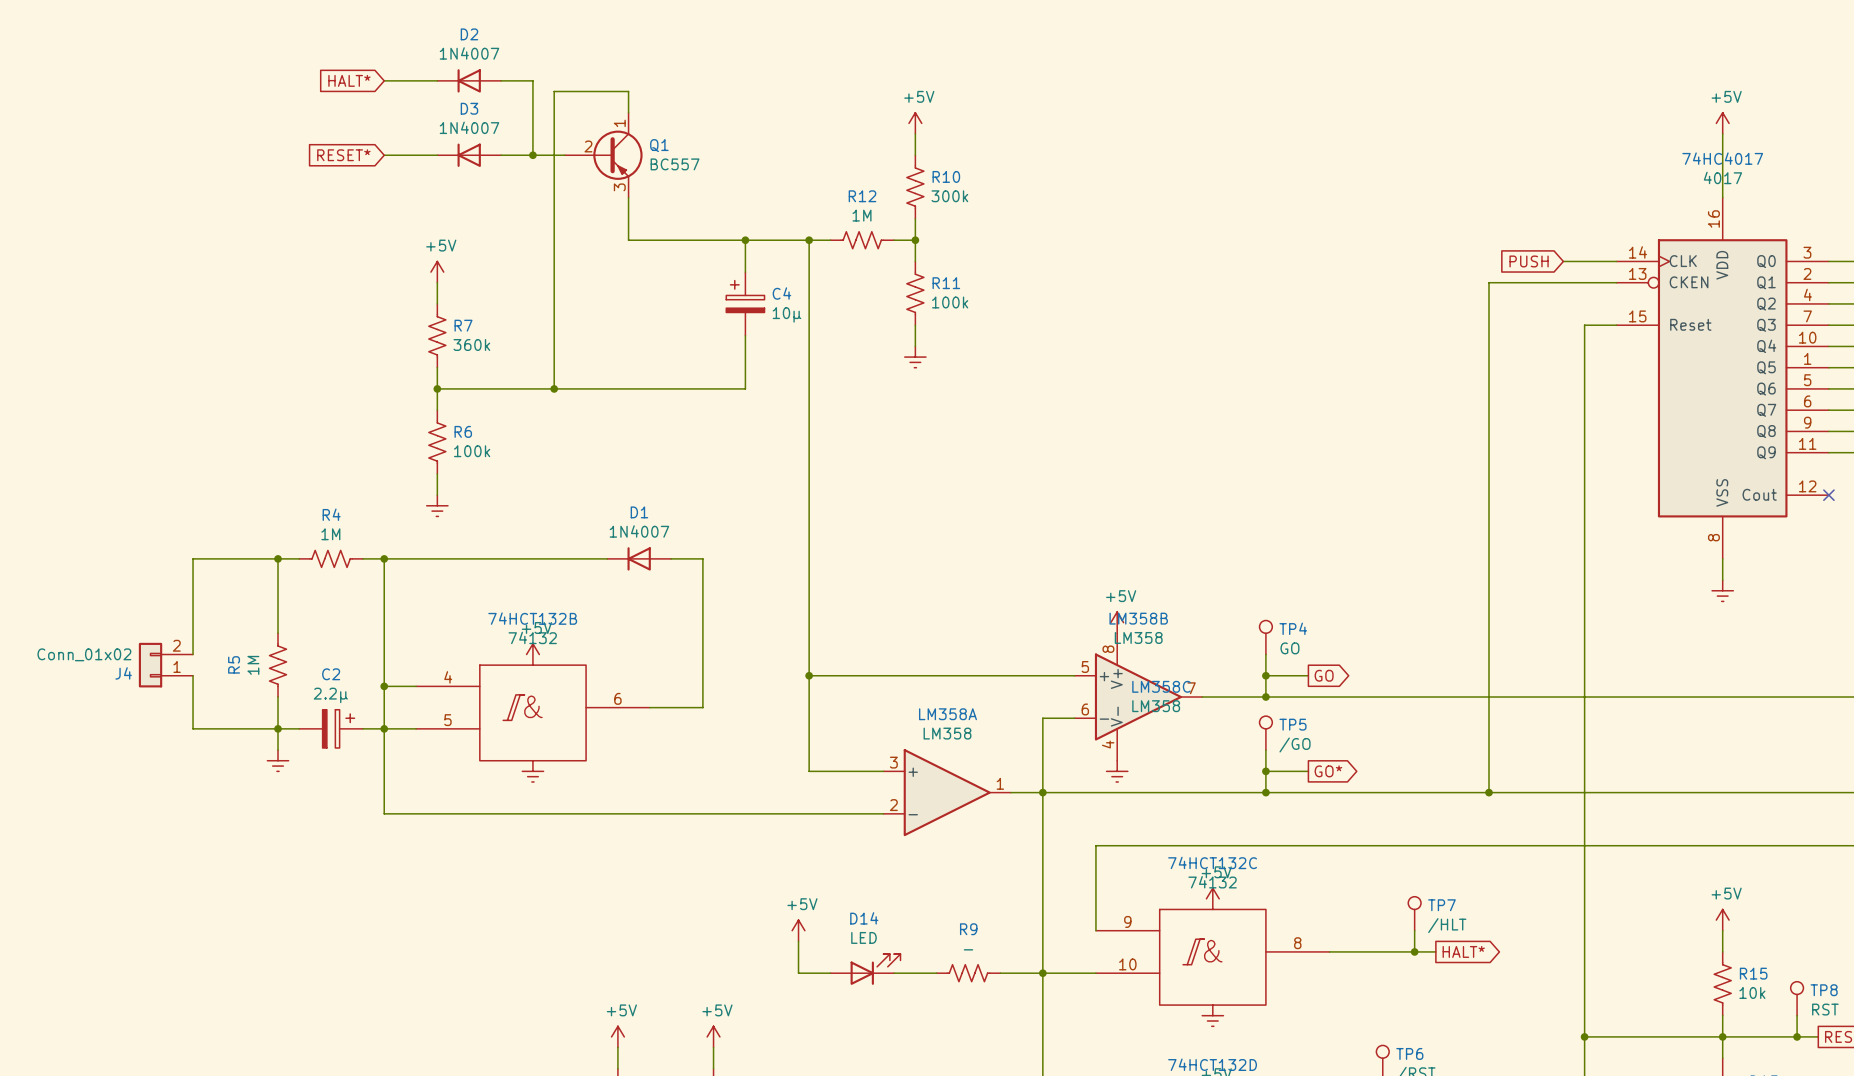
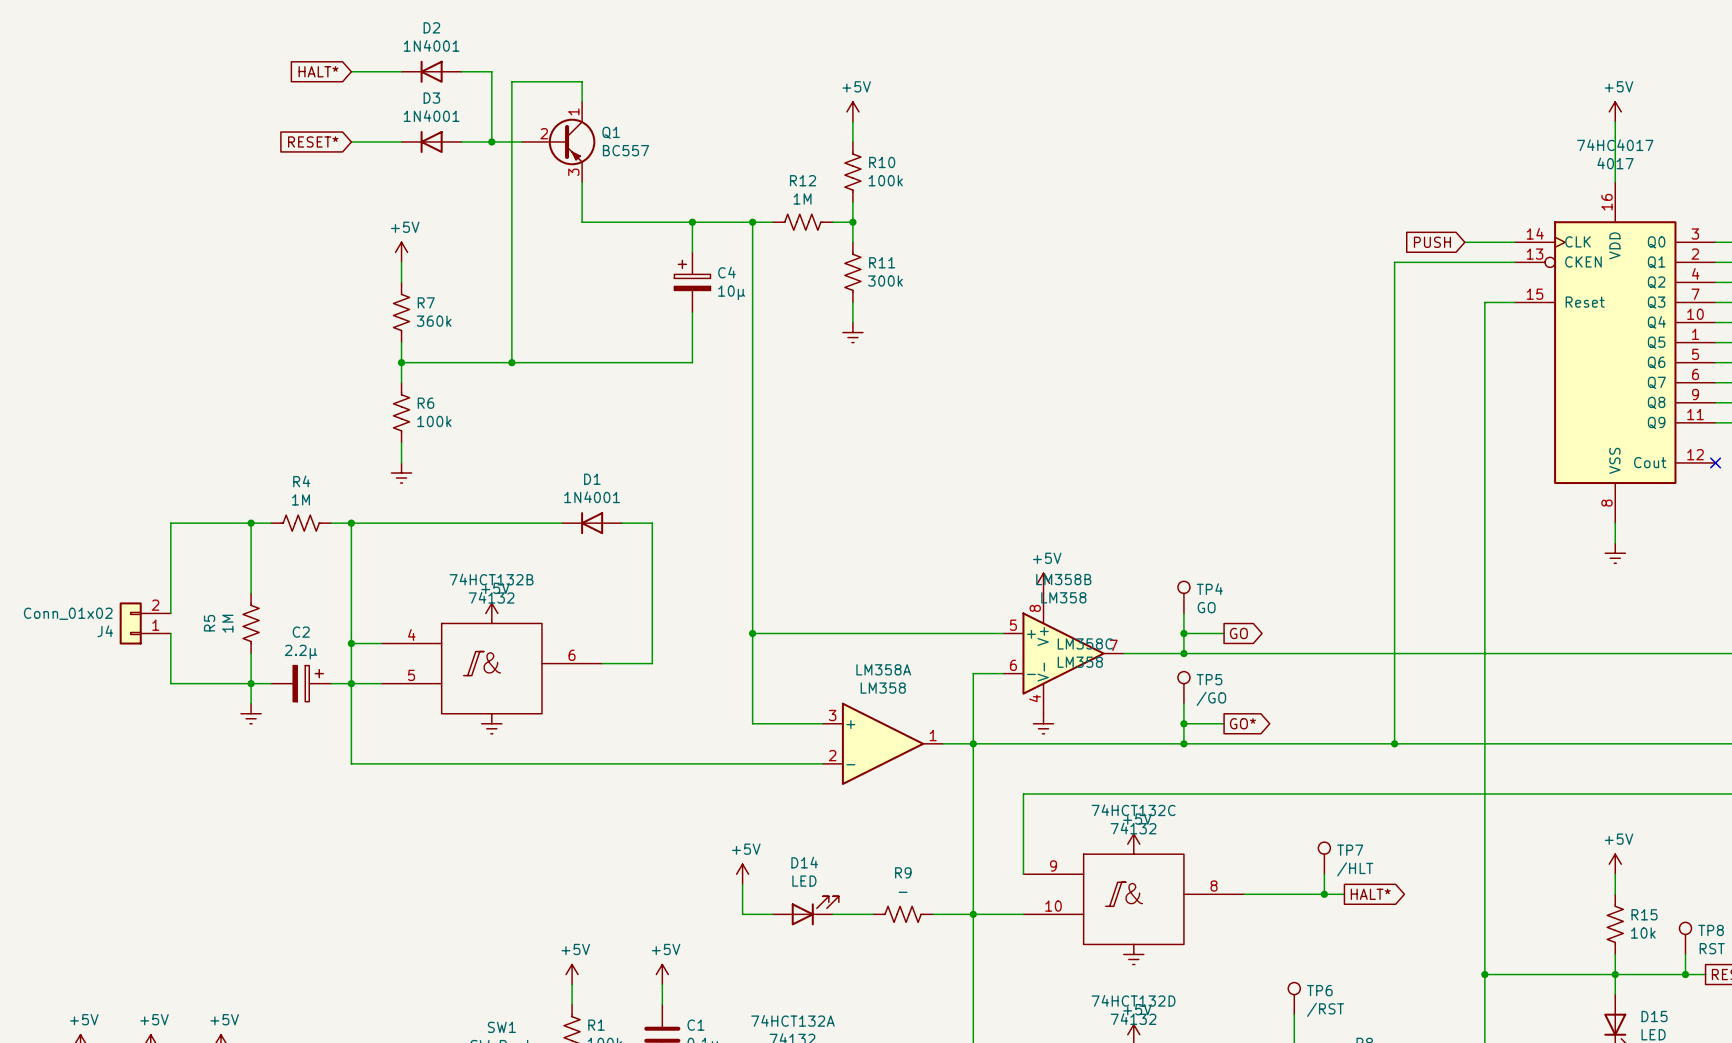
D2 value: 1N4007 (469, 53) -> 1N4001 (431, 45)
D3 value: 1N4007 (469, 127) -> 1N4001 (431, 116)
R10 value: 300k (949, 196) -> 100k (885, 180)
R11 value: 100k (950, 302) -> 300k (885, 281)
D1 value: 1N4007 (639, 531) -> 1N4001 (592, 497)

